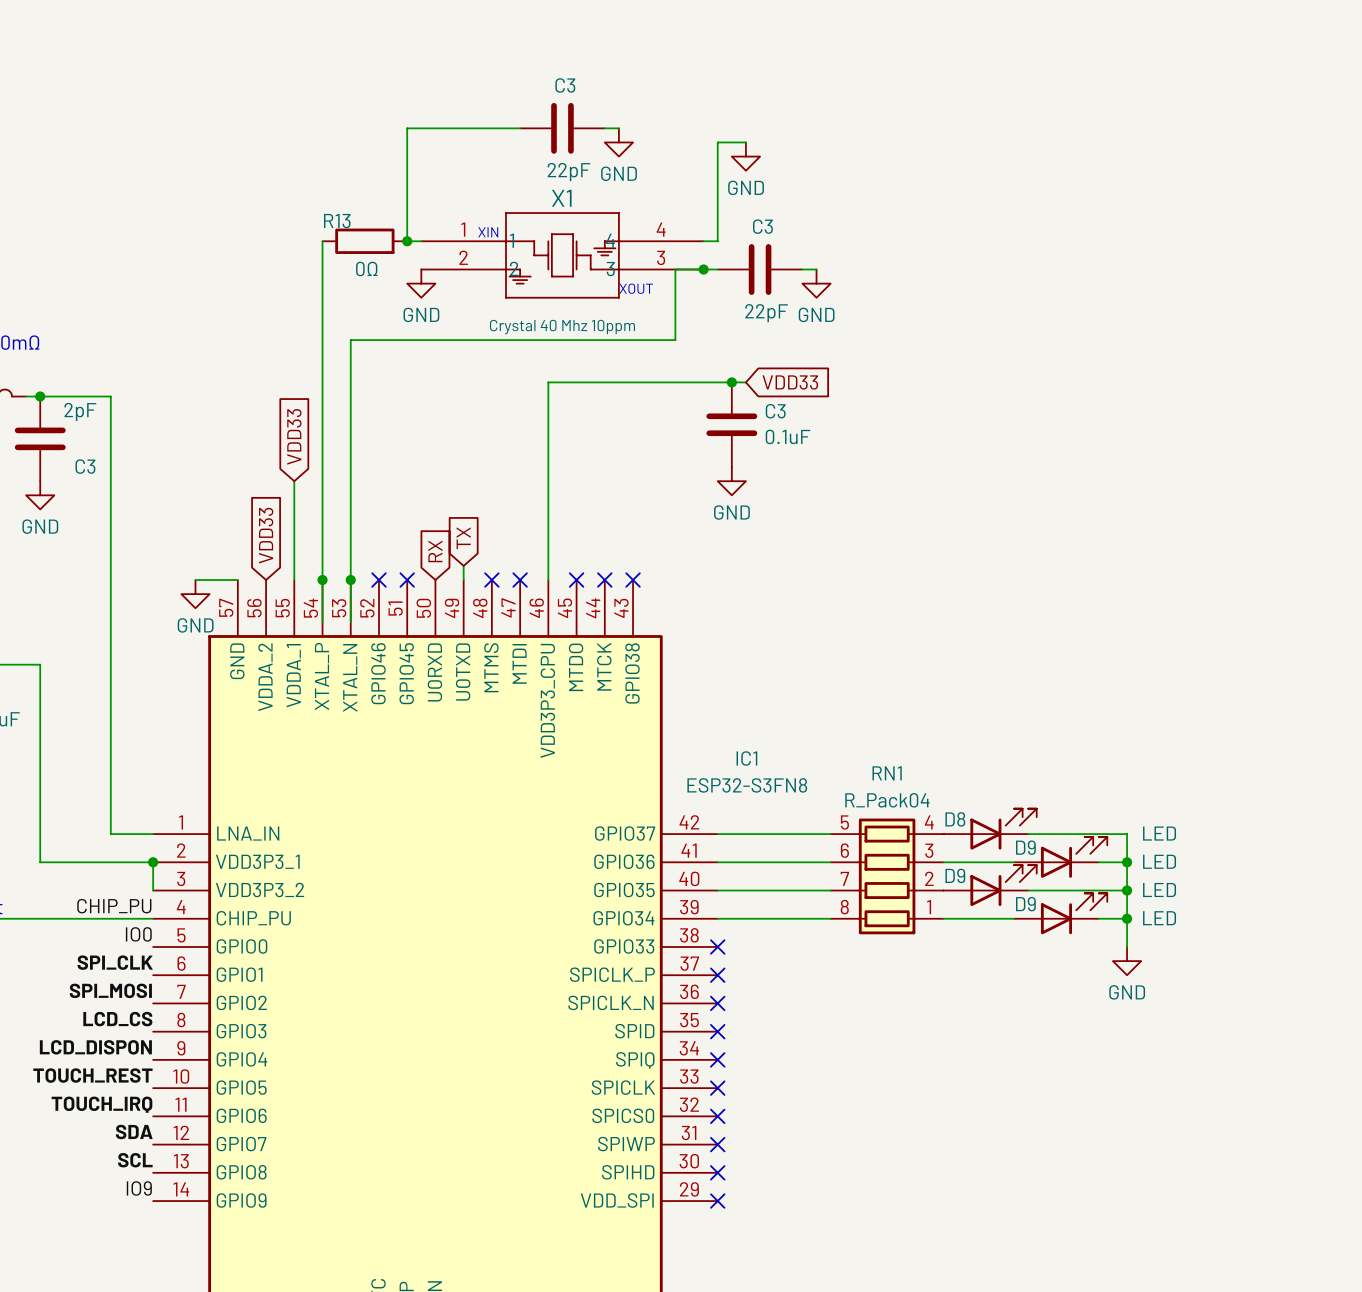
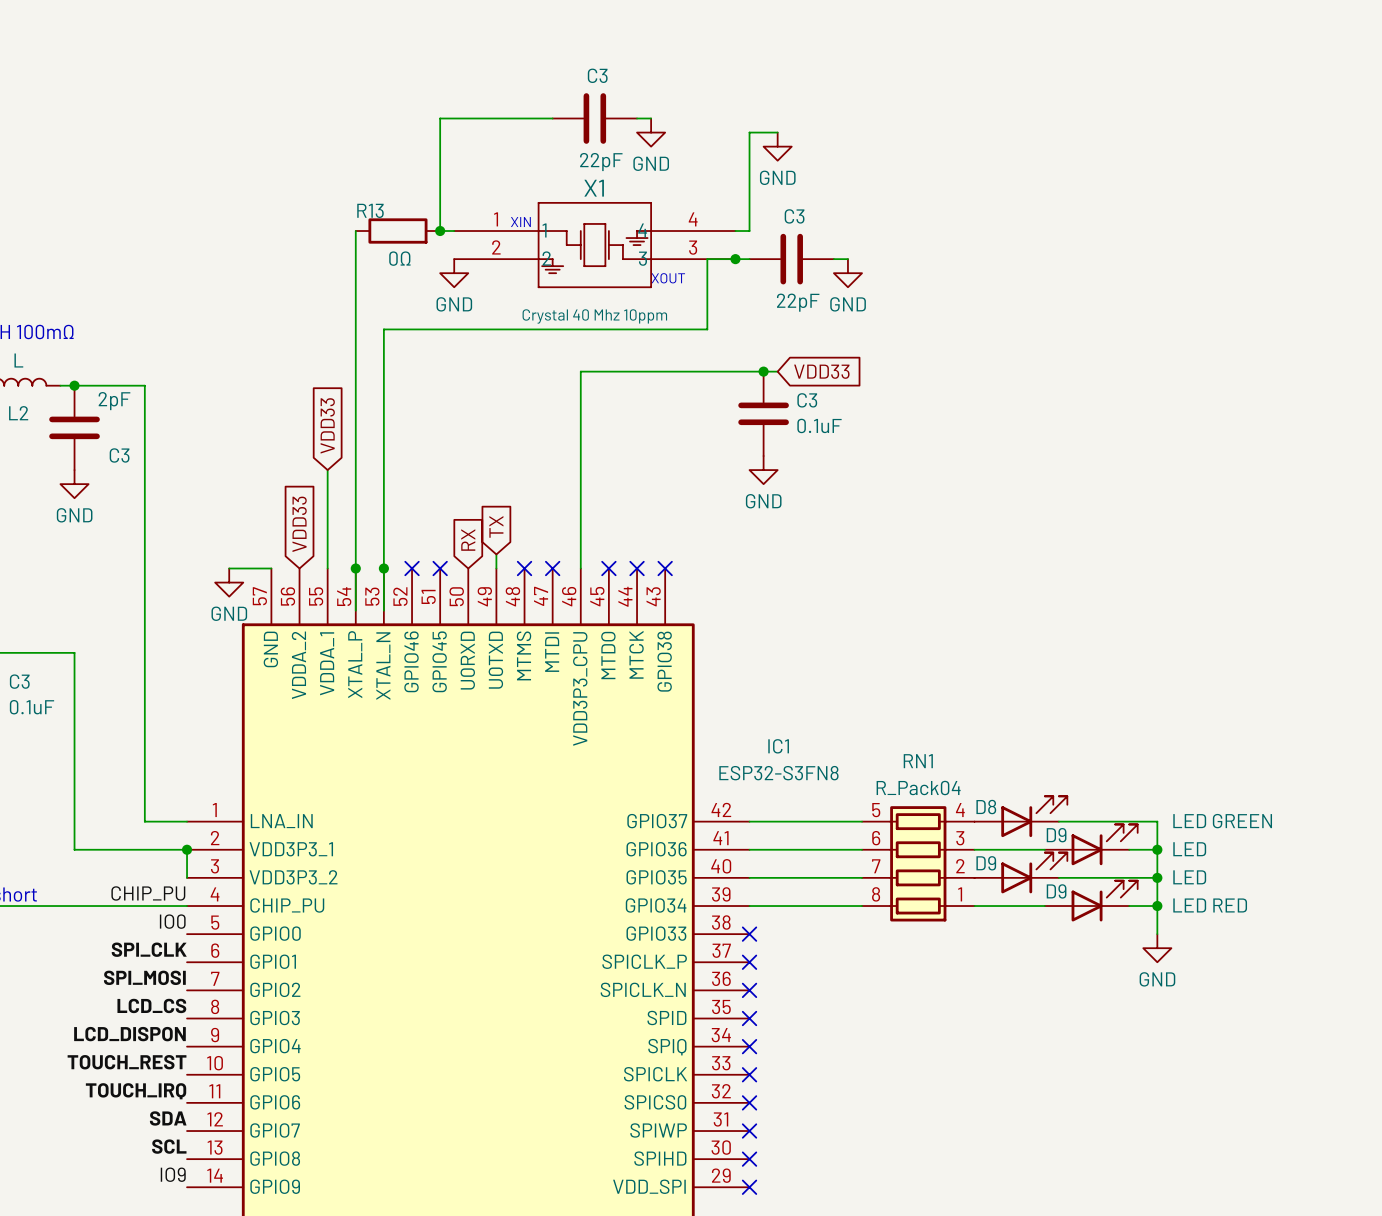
D8 value: LED (1159, 833) -> LED GREEN (1222, 821)
D9 value: LED (1159, 918) -> LED RED (1210, 905)

